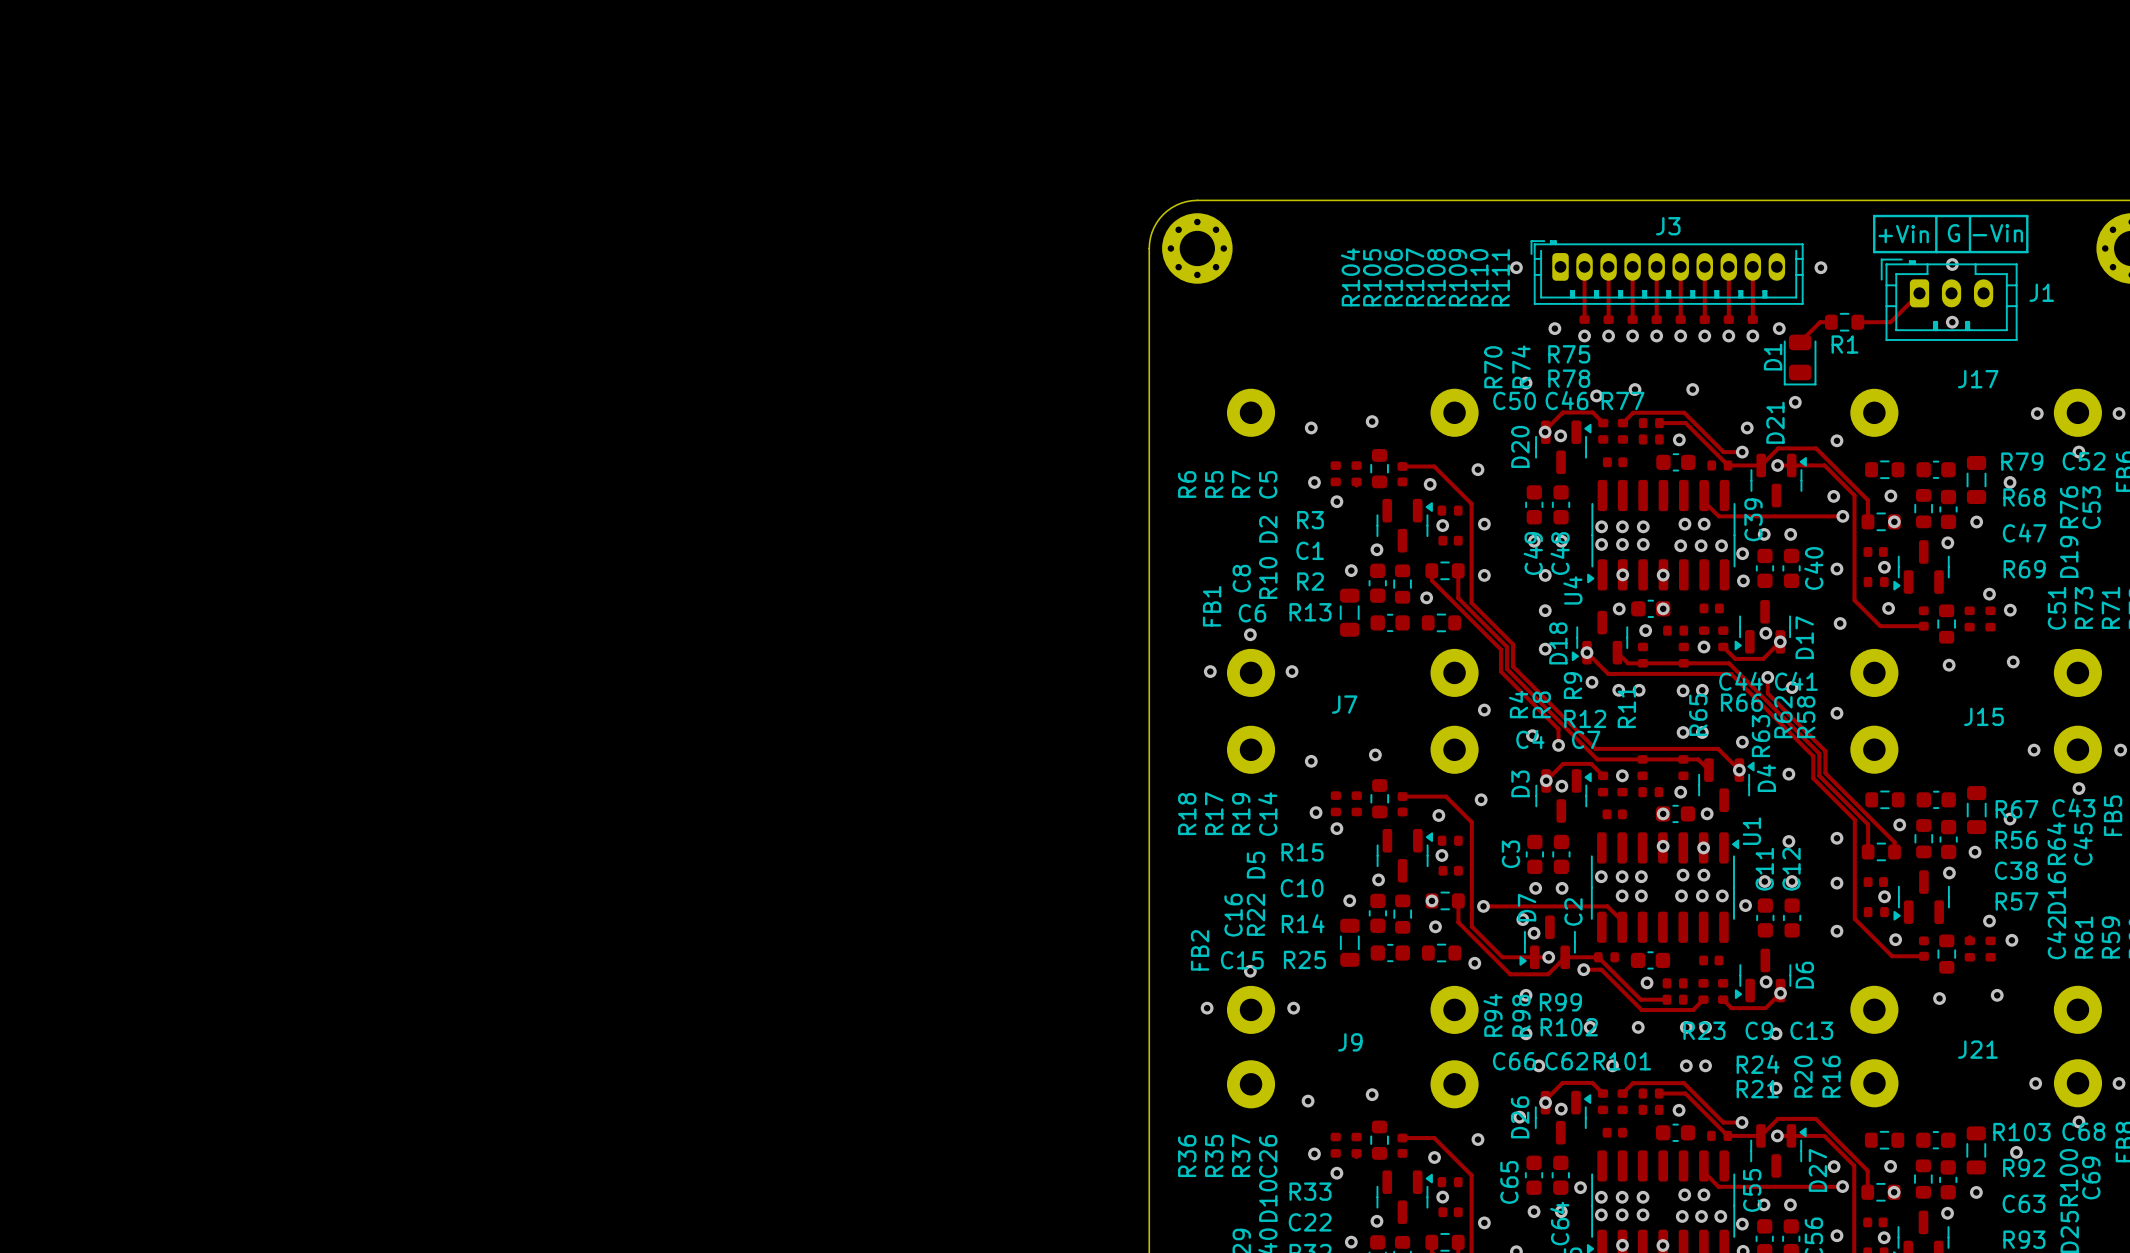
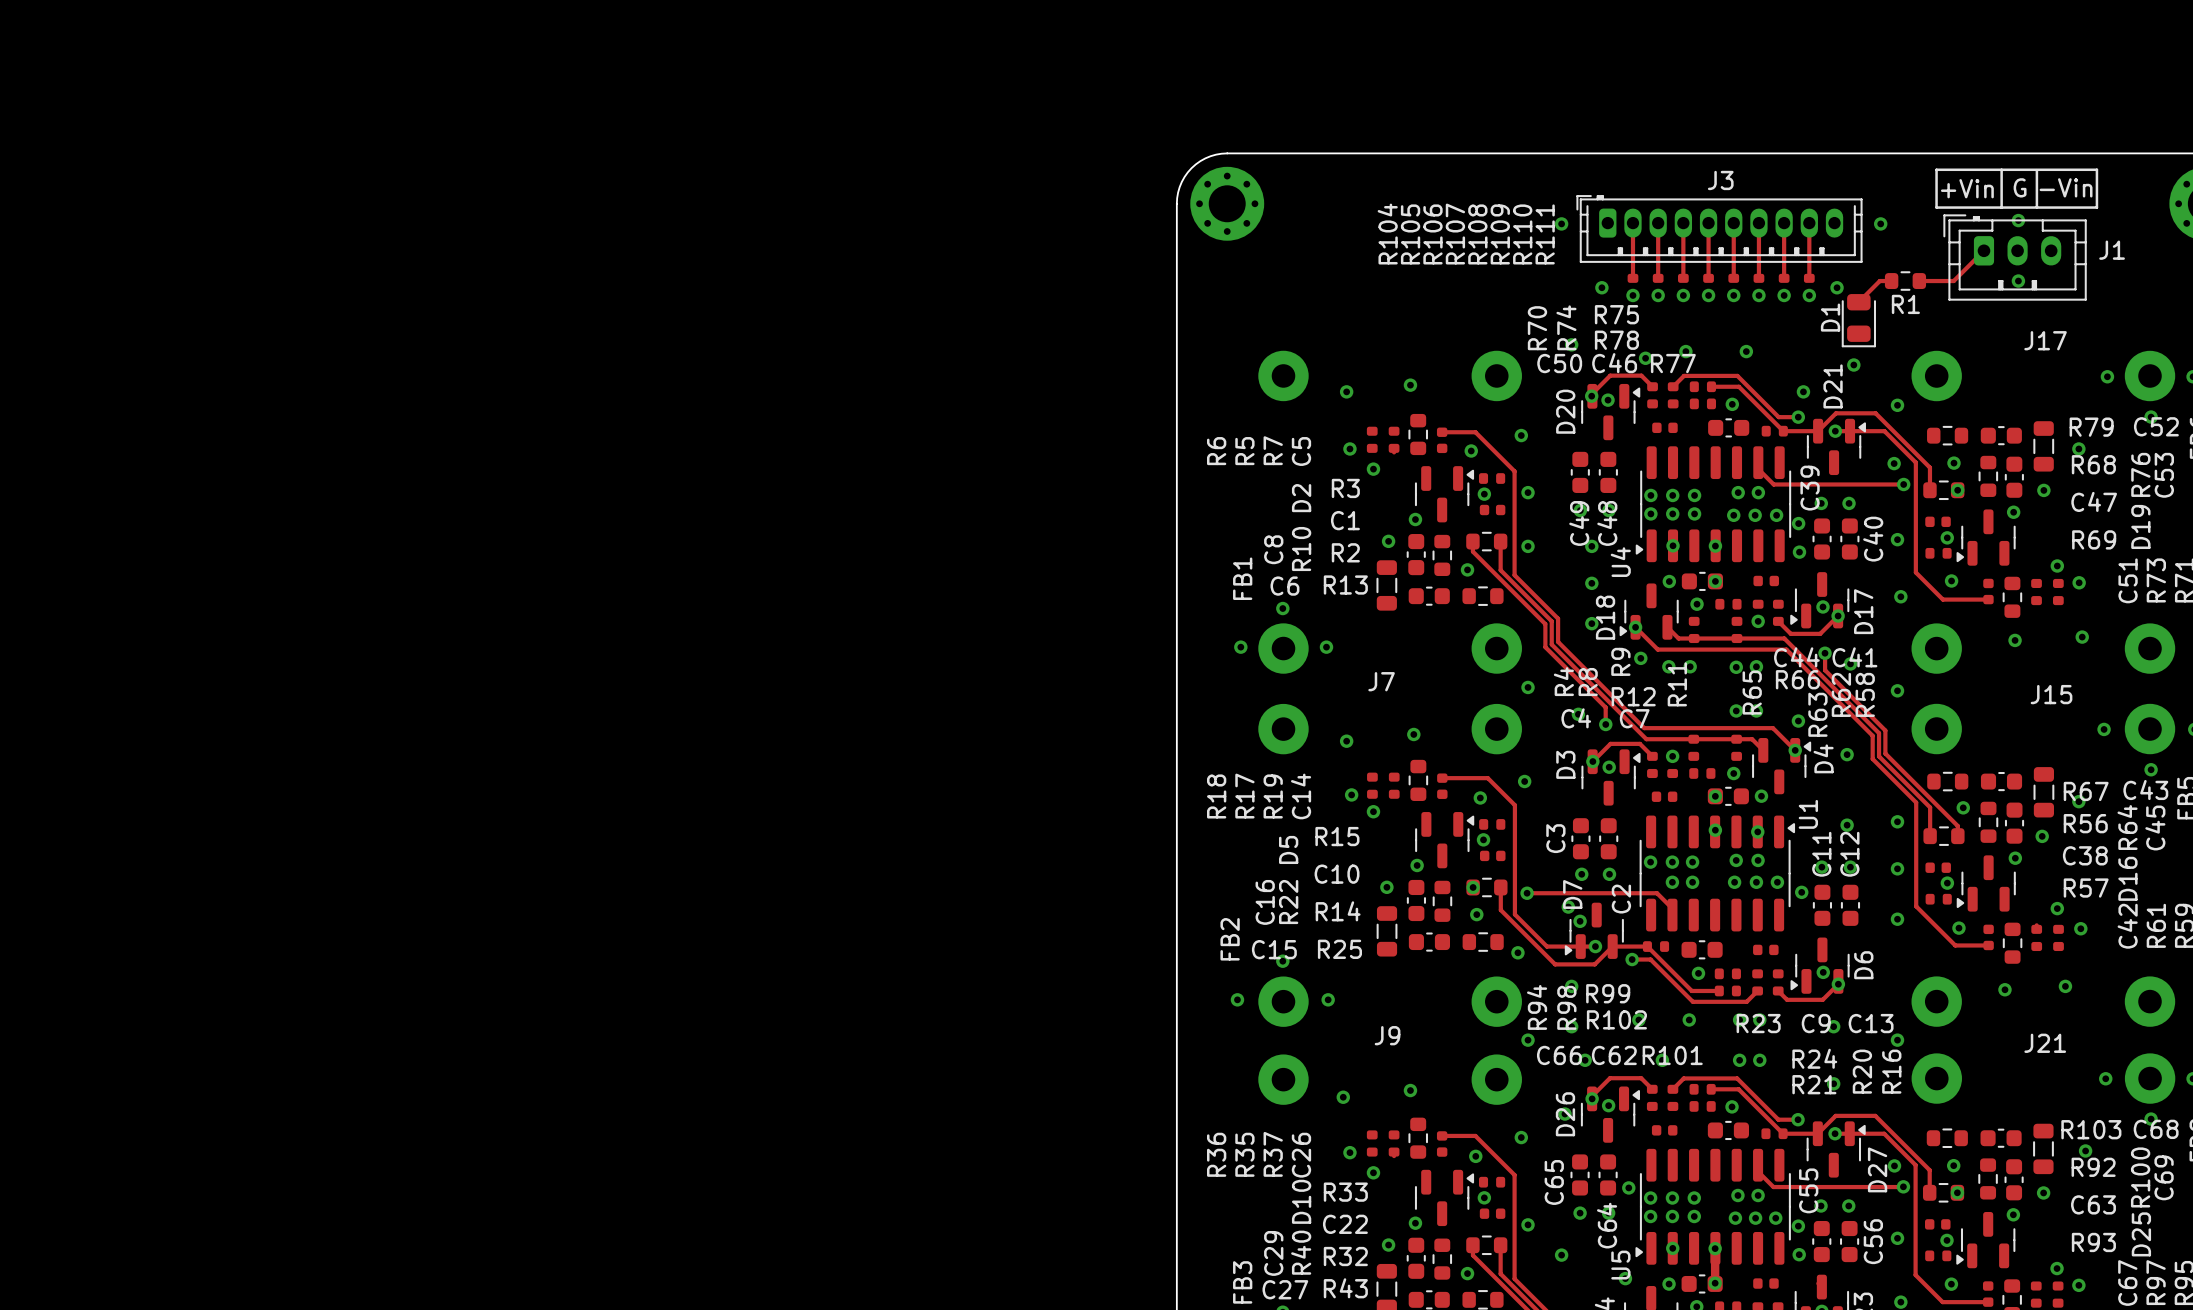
via: none -> (1528, 1040)
via: none -> (1897, 1040)

